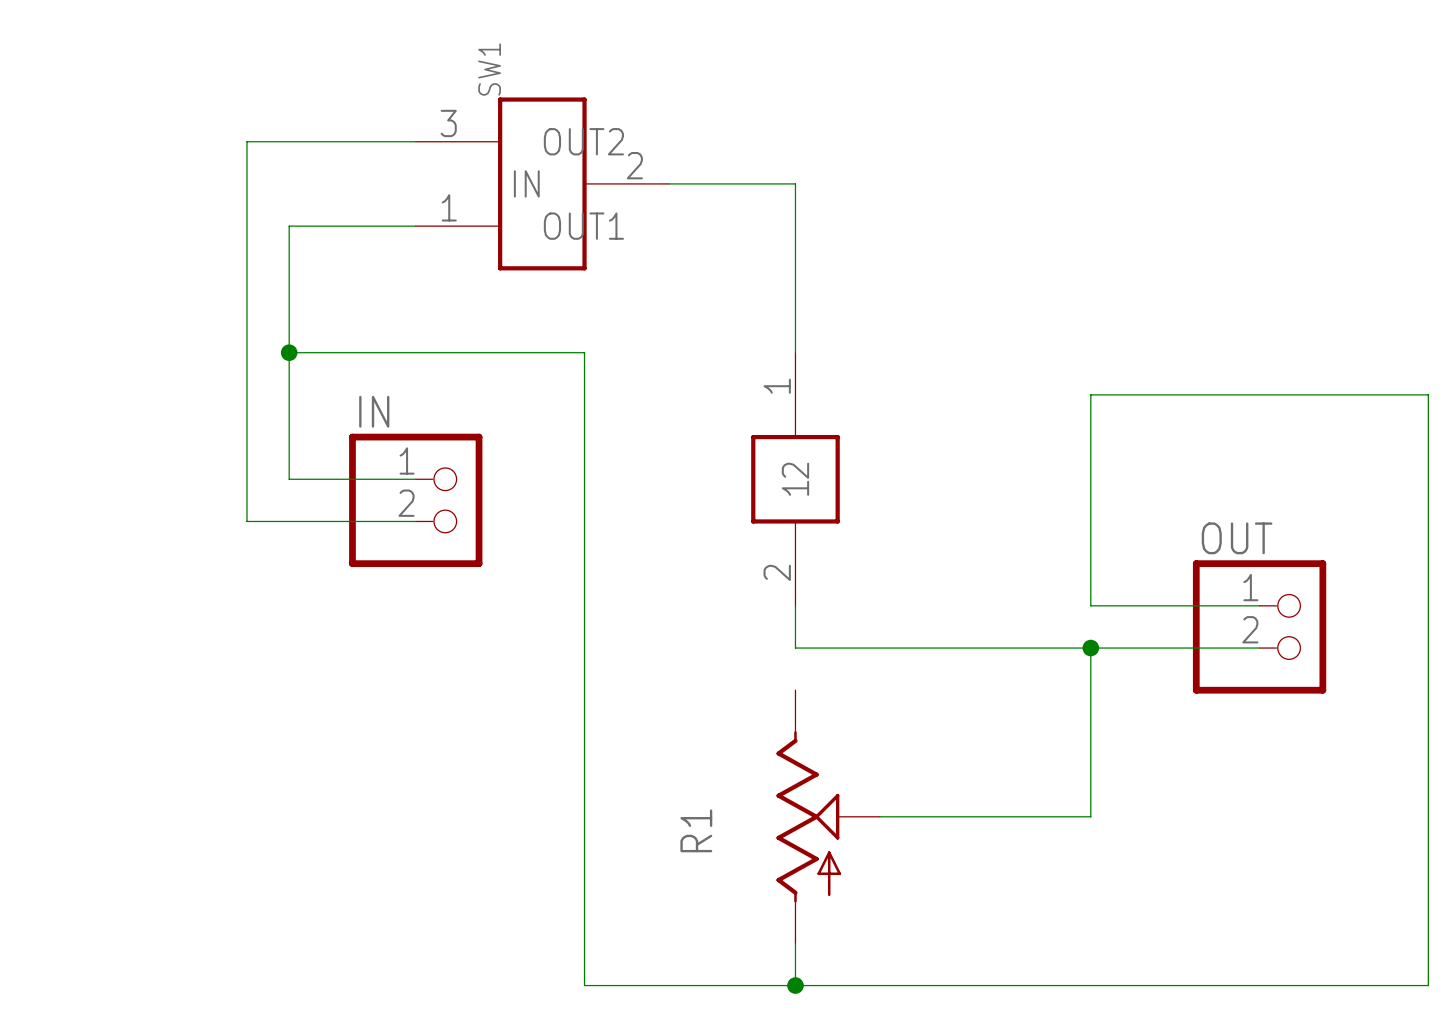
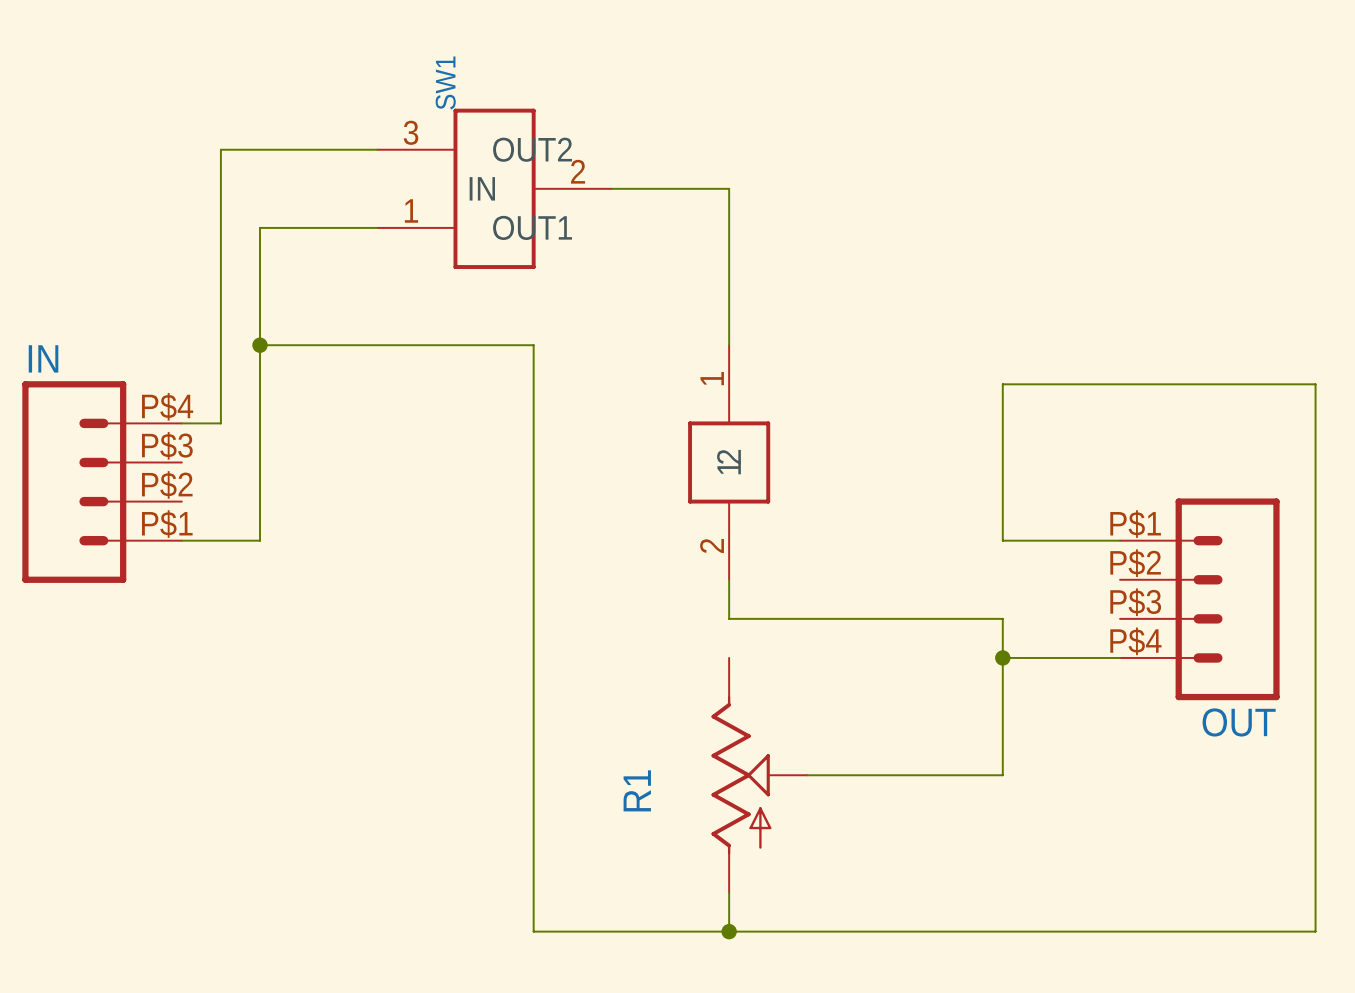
wire: (246, 437) (246, 521) (415, 521) -> (220, 423) (181, 423)
wire: (289, 479) (415, 479) -> (260, 462) (260, 540) (181, 540)
IN: none -> (102, 482)
IN: (415, 500) -> none
wire: (1090, 563) (1090, 605) (1259, 605) -> (1002, 540) (1120, 540)
OUT: (1259, 626) -> none
OUT: none -> (1199, 599)
wire: (1090, 648) (1259, 648) -> none
junction position: (1090, 648) -> (1002, 657)
wire: none -> (1002, 657) (1120, 657)

